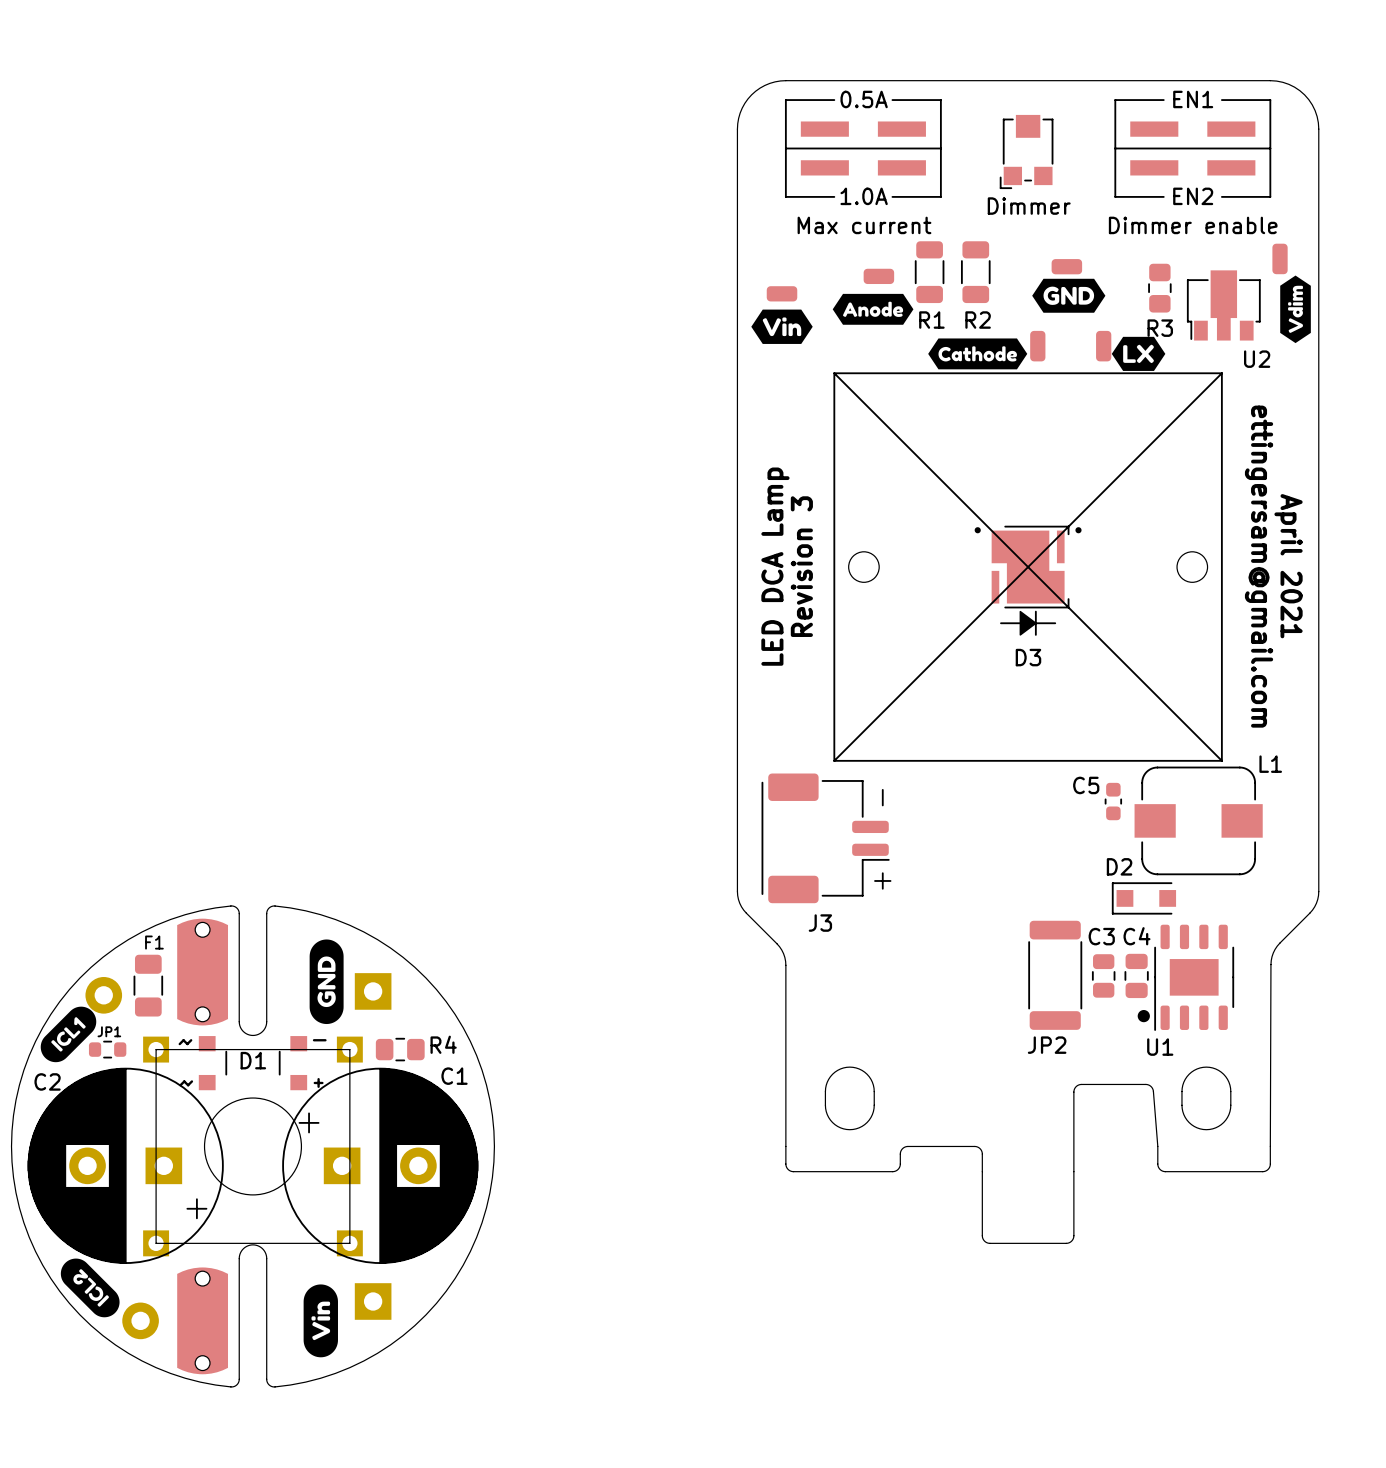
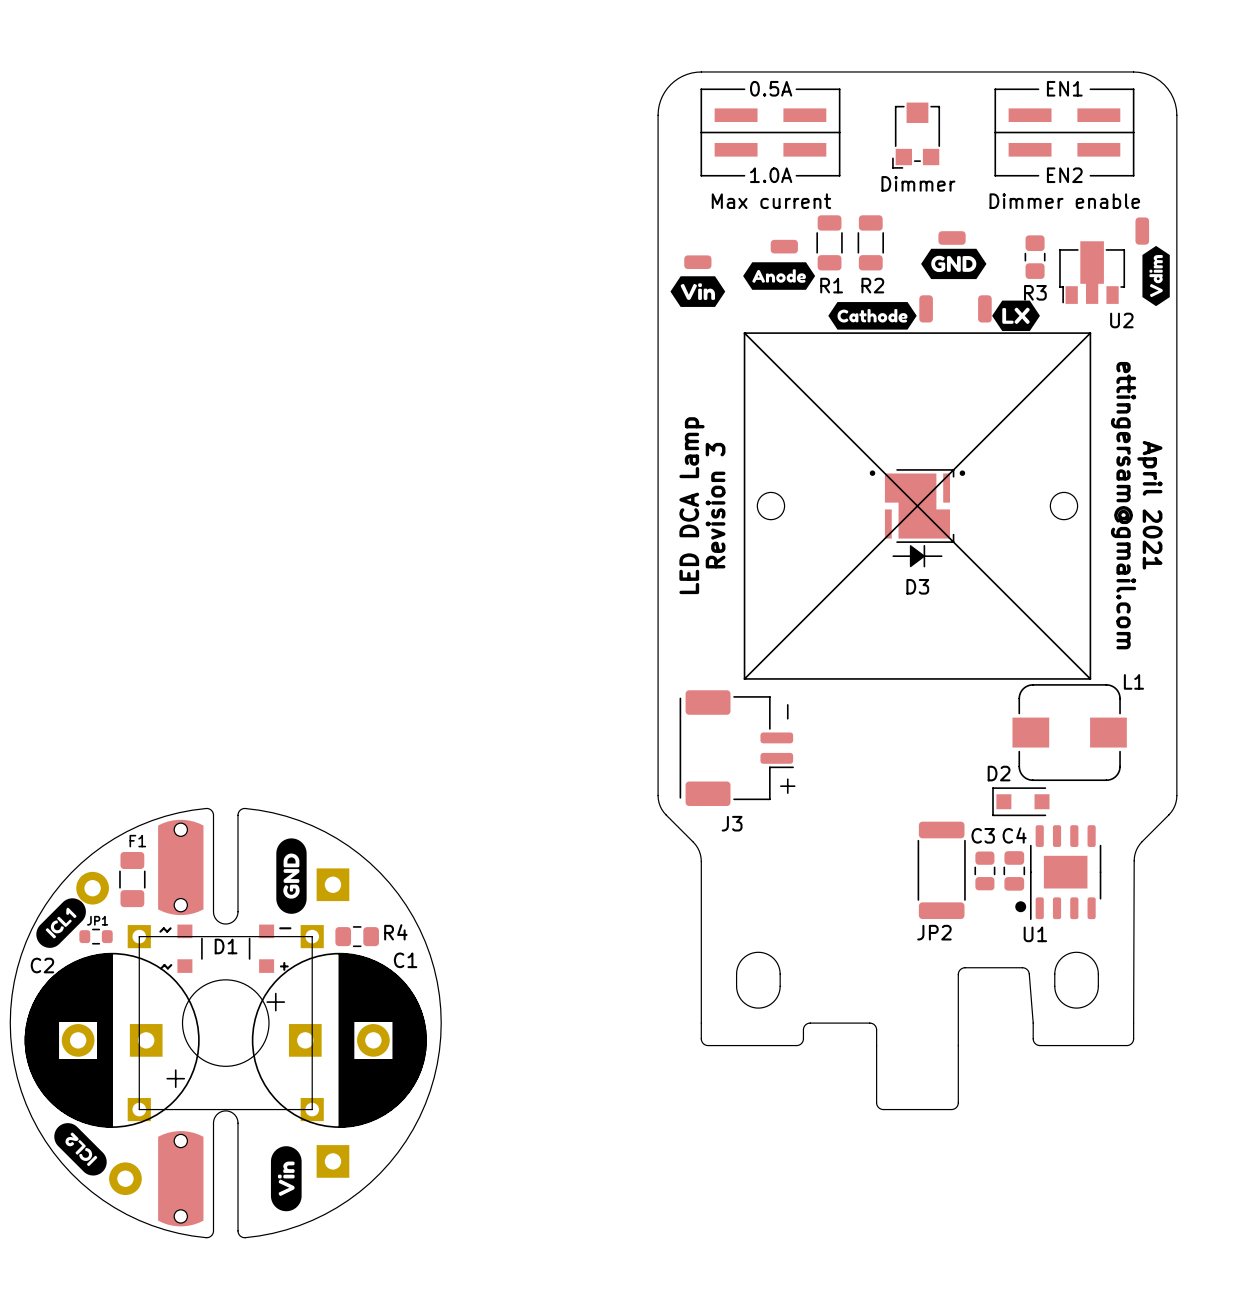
C5: (1113, 801) -> none

